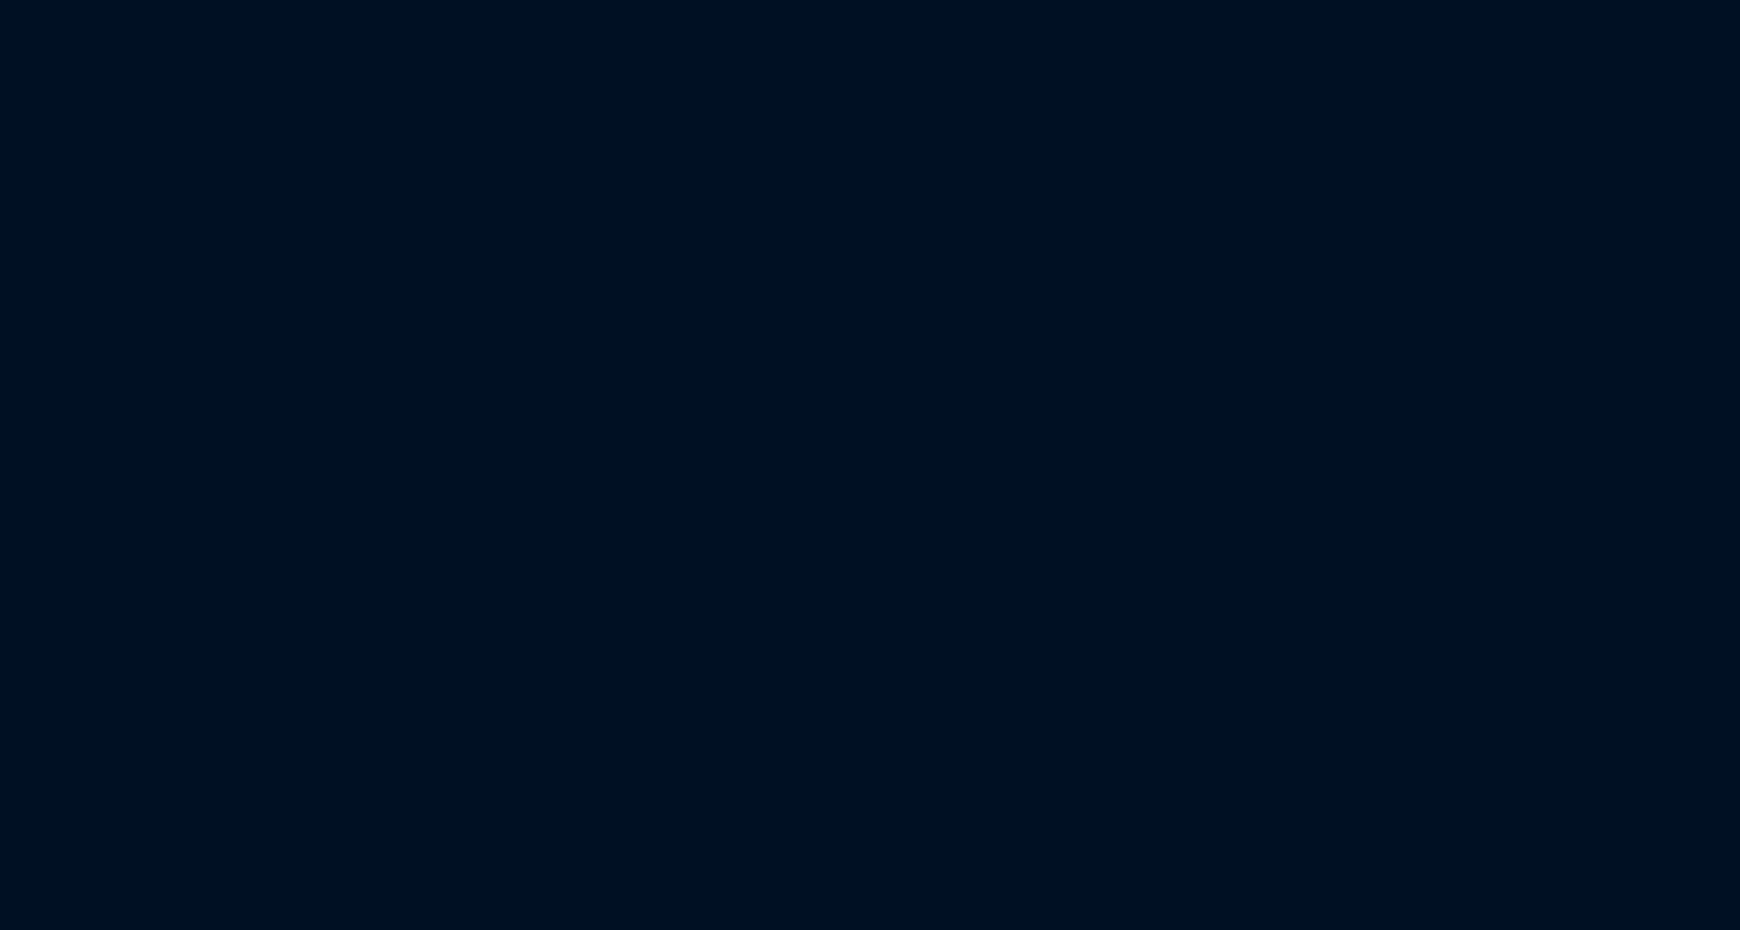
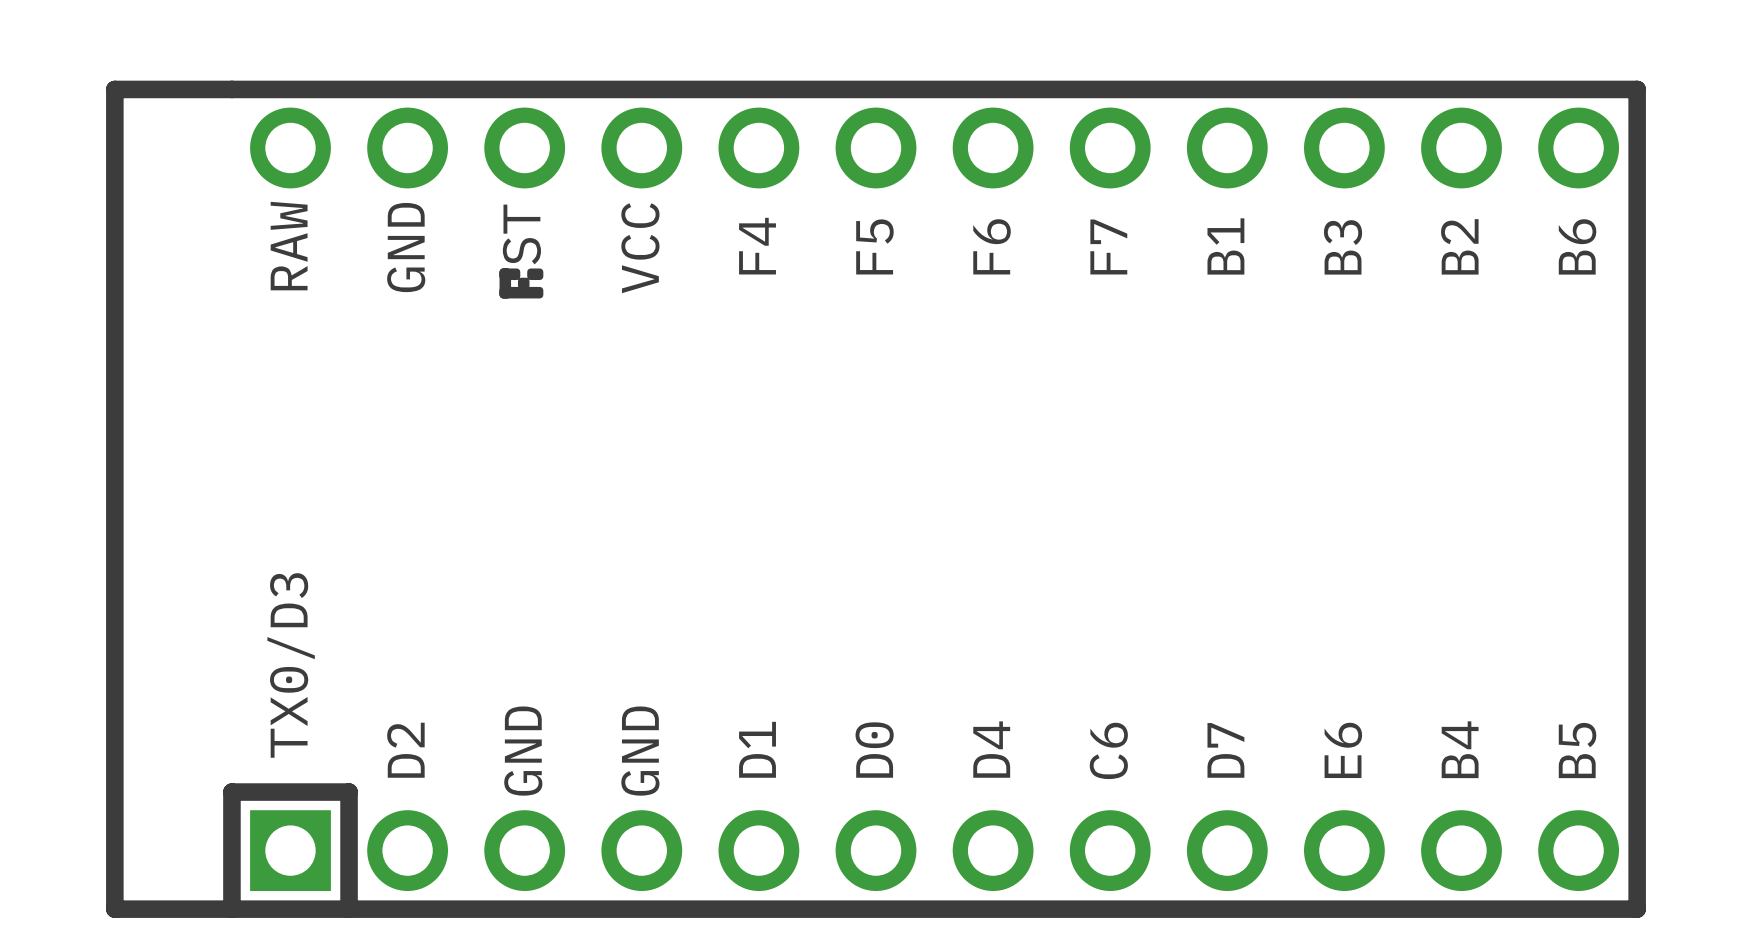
part: none -> (876, 499)

